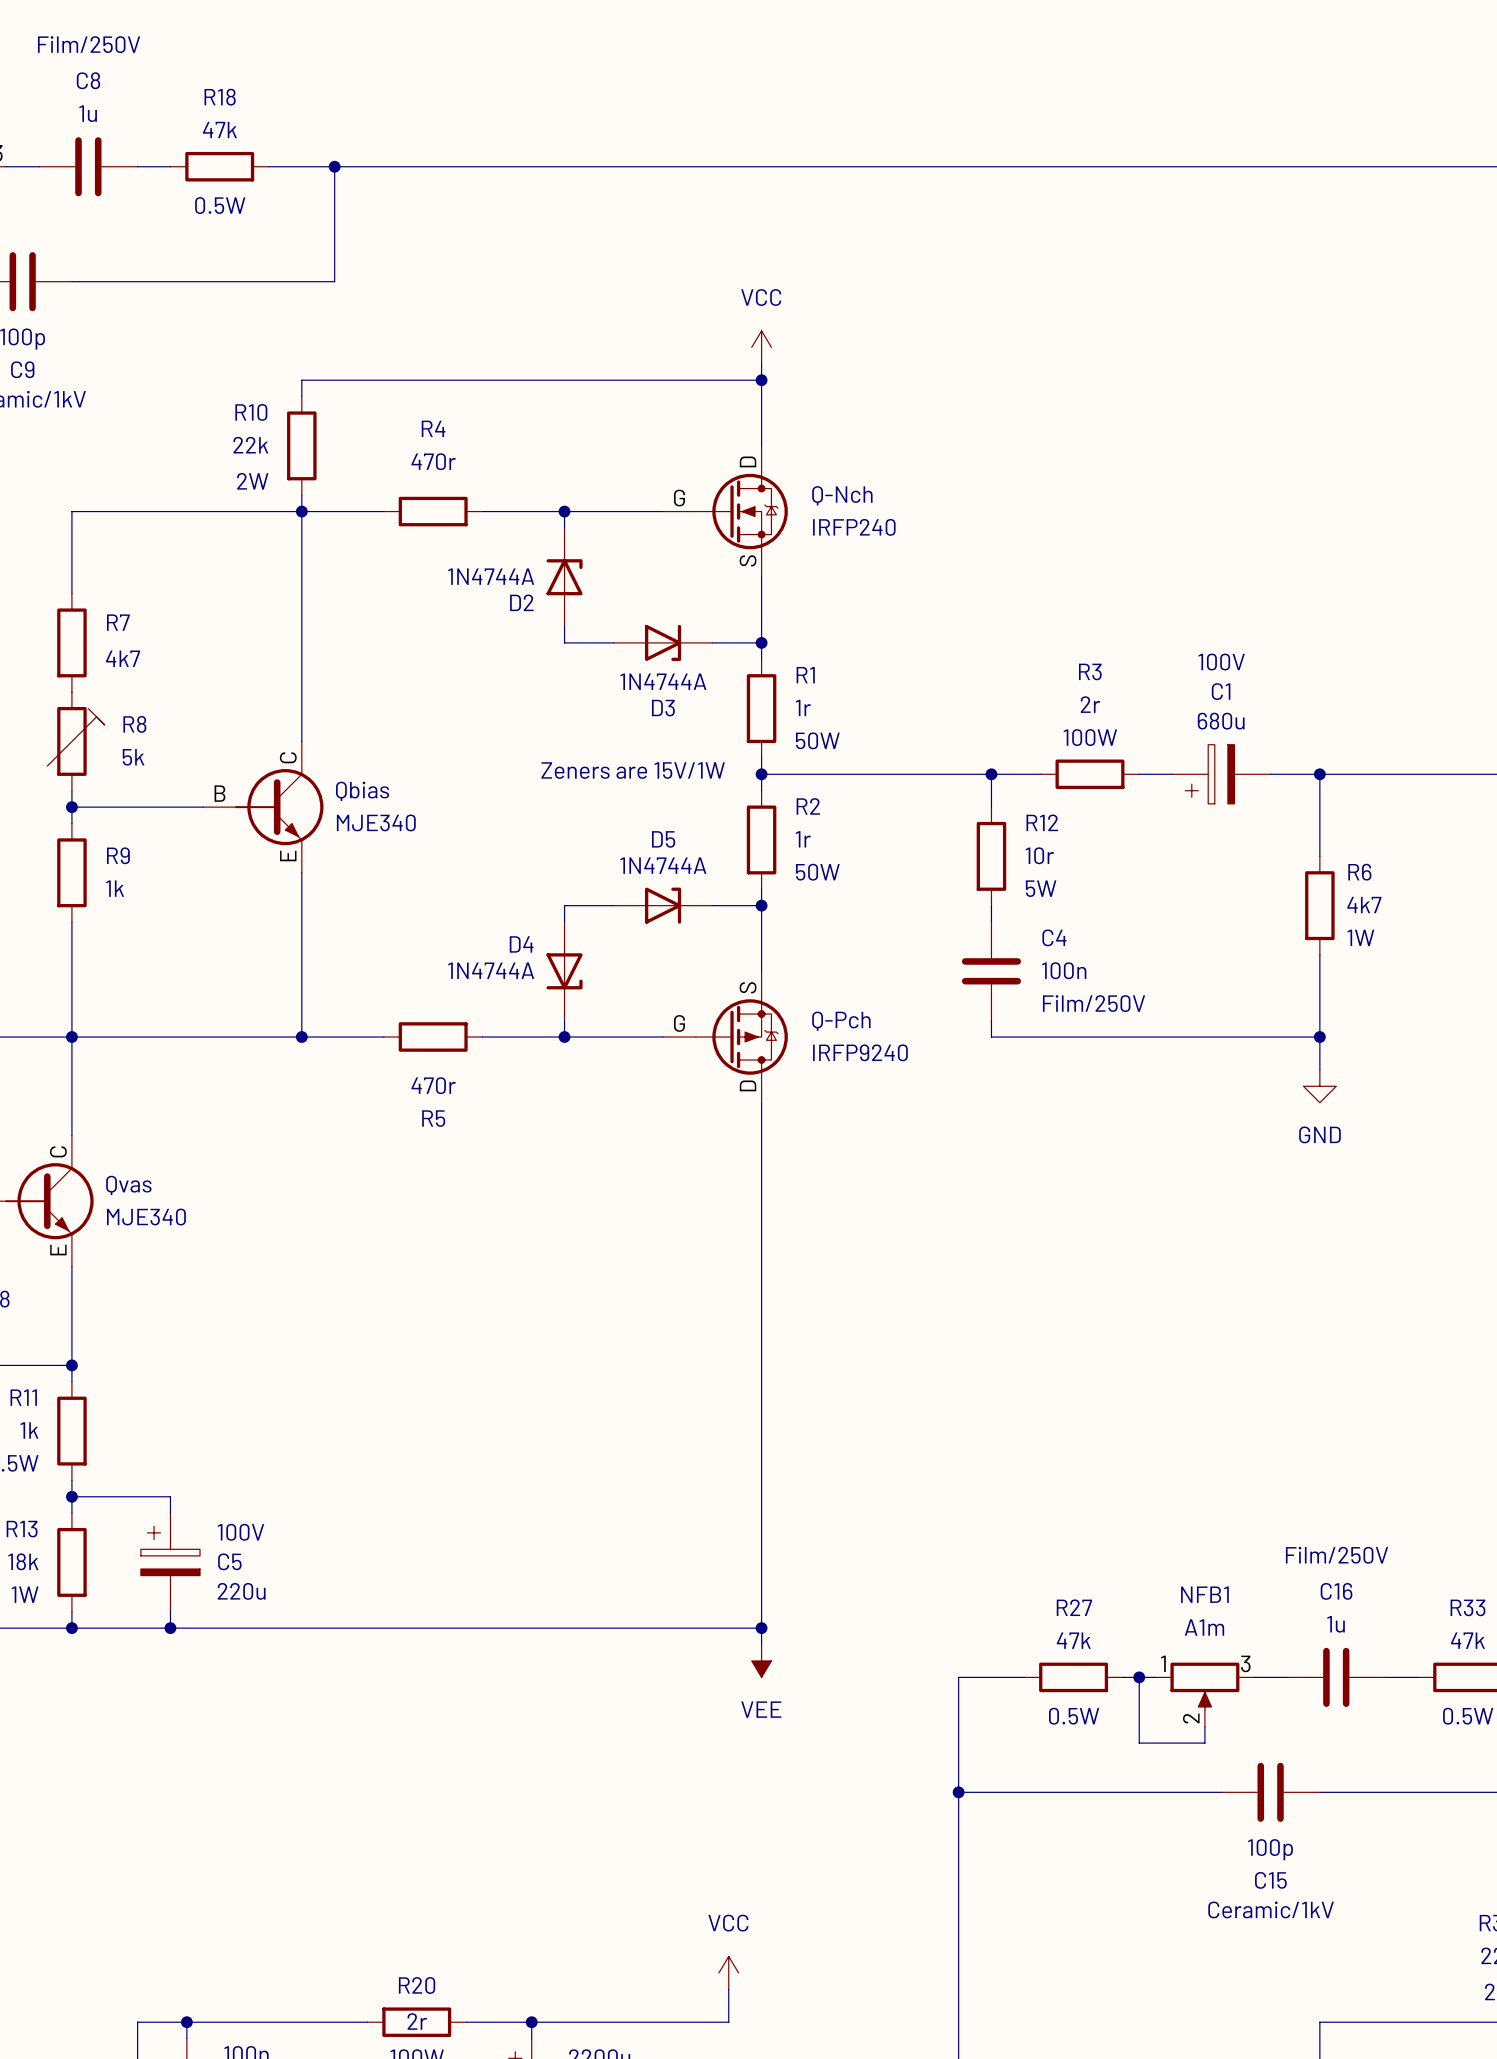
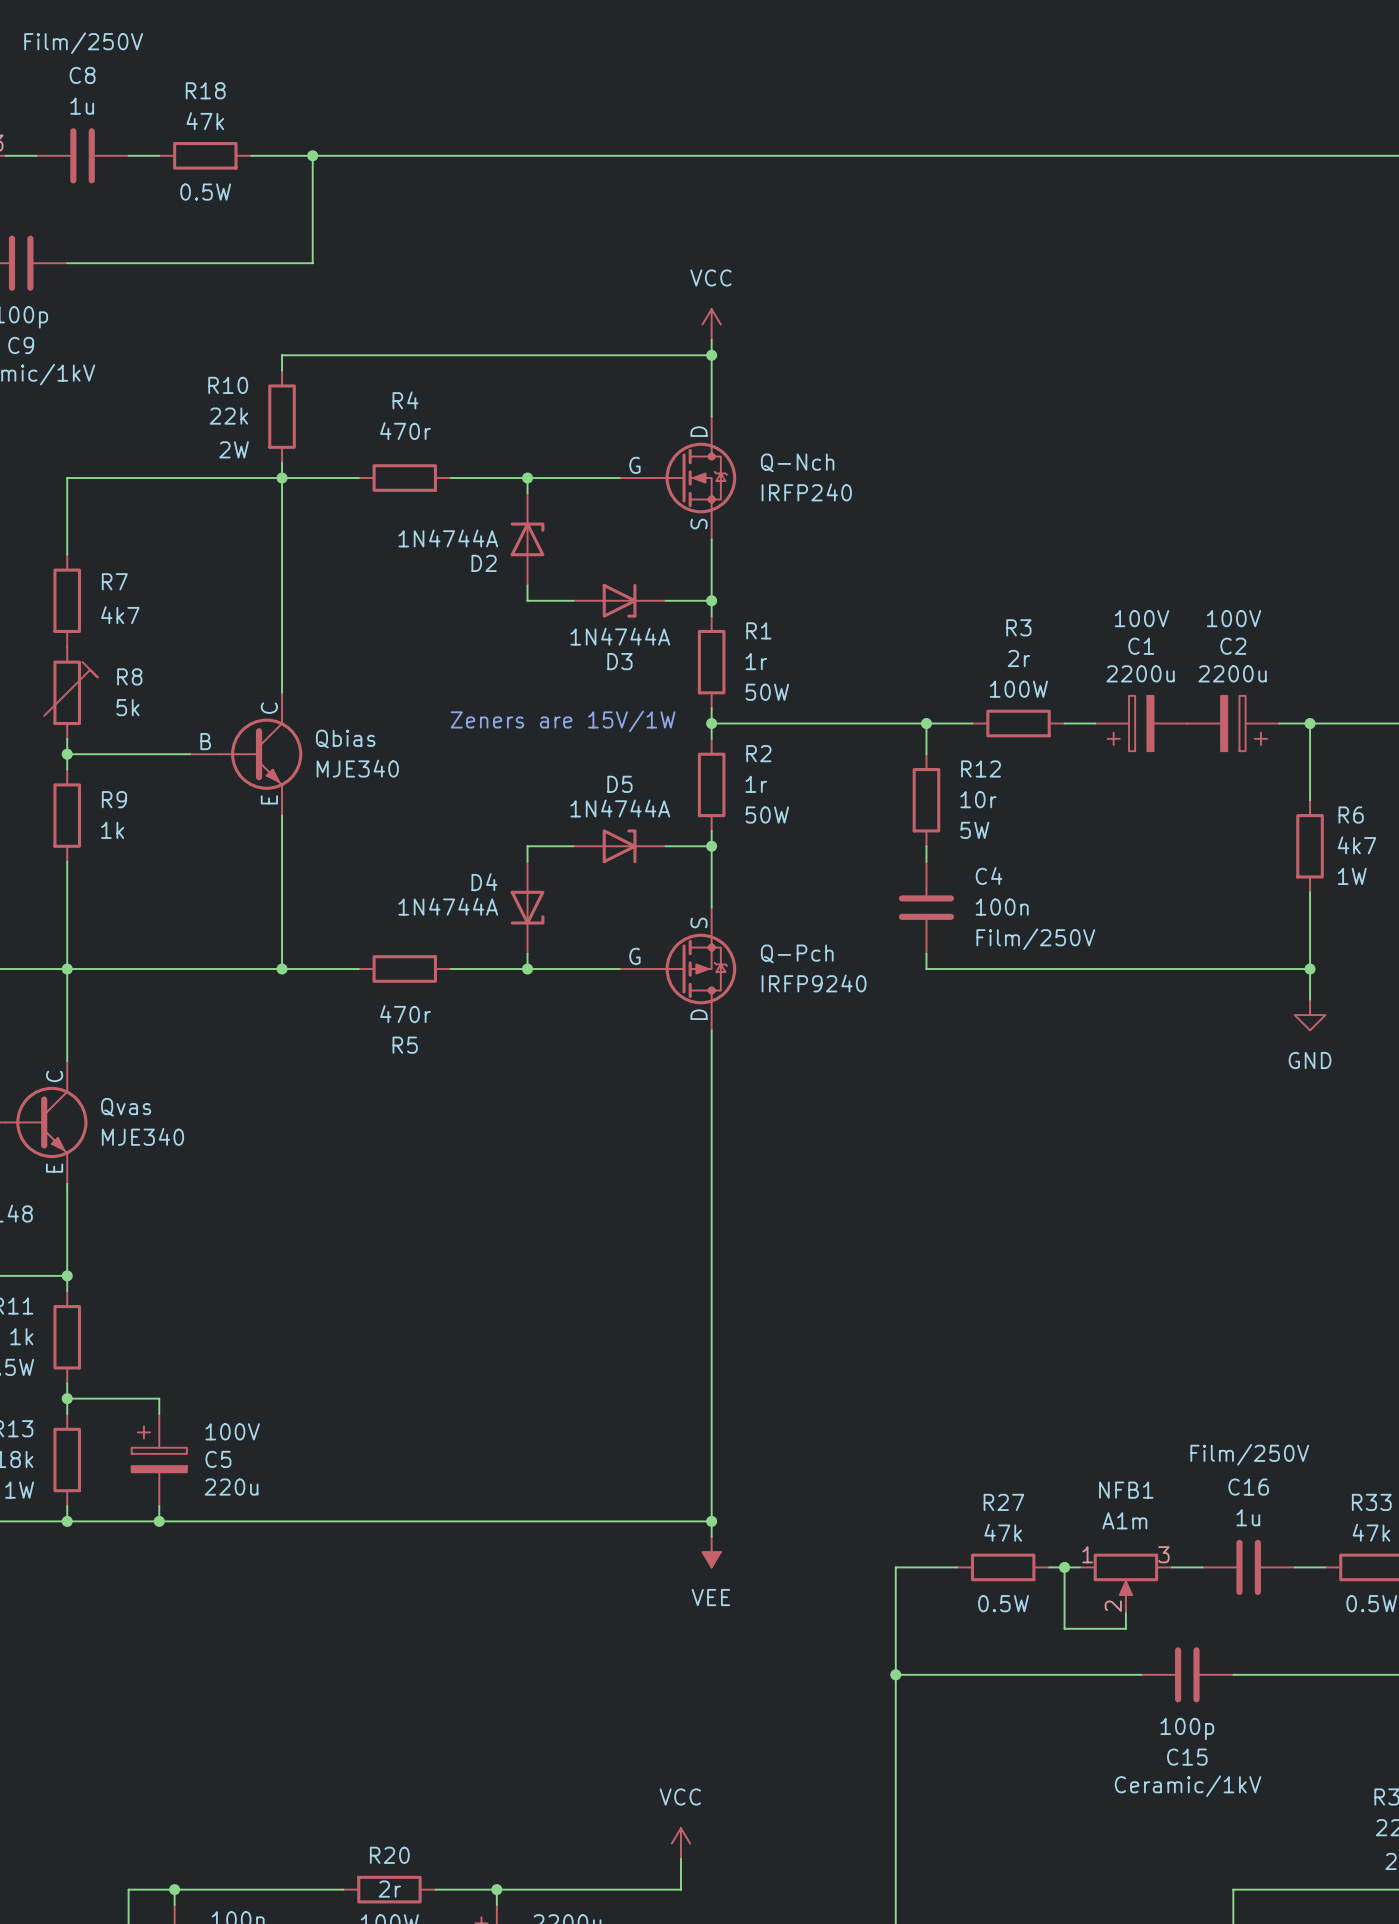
C1 value: 680u (1221, 721) -> 2200u (1140, 673)
wire: (1319, 774) (1319, 856) -> (1310, 723) (1310, 800)
junction: (1319, 774) -> none
C2: none -> 2200u (1233, 723)
junction: none -> (1310, 723)
R6 position: (1319, 905) -> (1310, 846)
wire: (1319, 954) (1319, 1069) -> (1310, 892) (1310, 999)
wire: none -> (1233, 969) (1310, 969)
junction: (1319, 1037) -> none
junction: none -> (1310, 969)
power symbol position: GND (1319, 1086) -> GND (1310, 1015)

